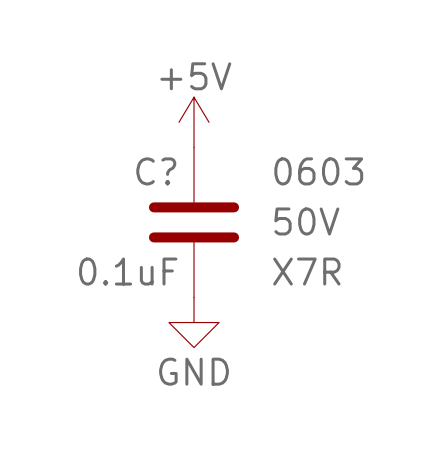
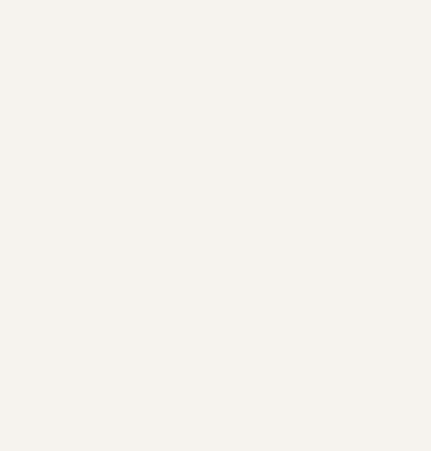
power symbol: +5V (194, 122) -> none
C?: 0.1uF (194, 222) -> none
power symbol: GND (194, 322) -> none

